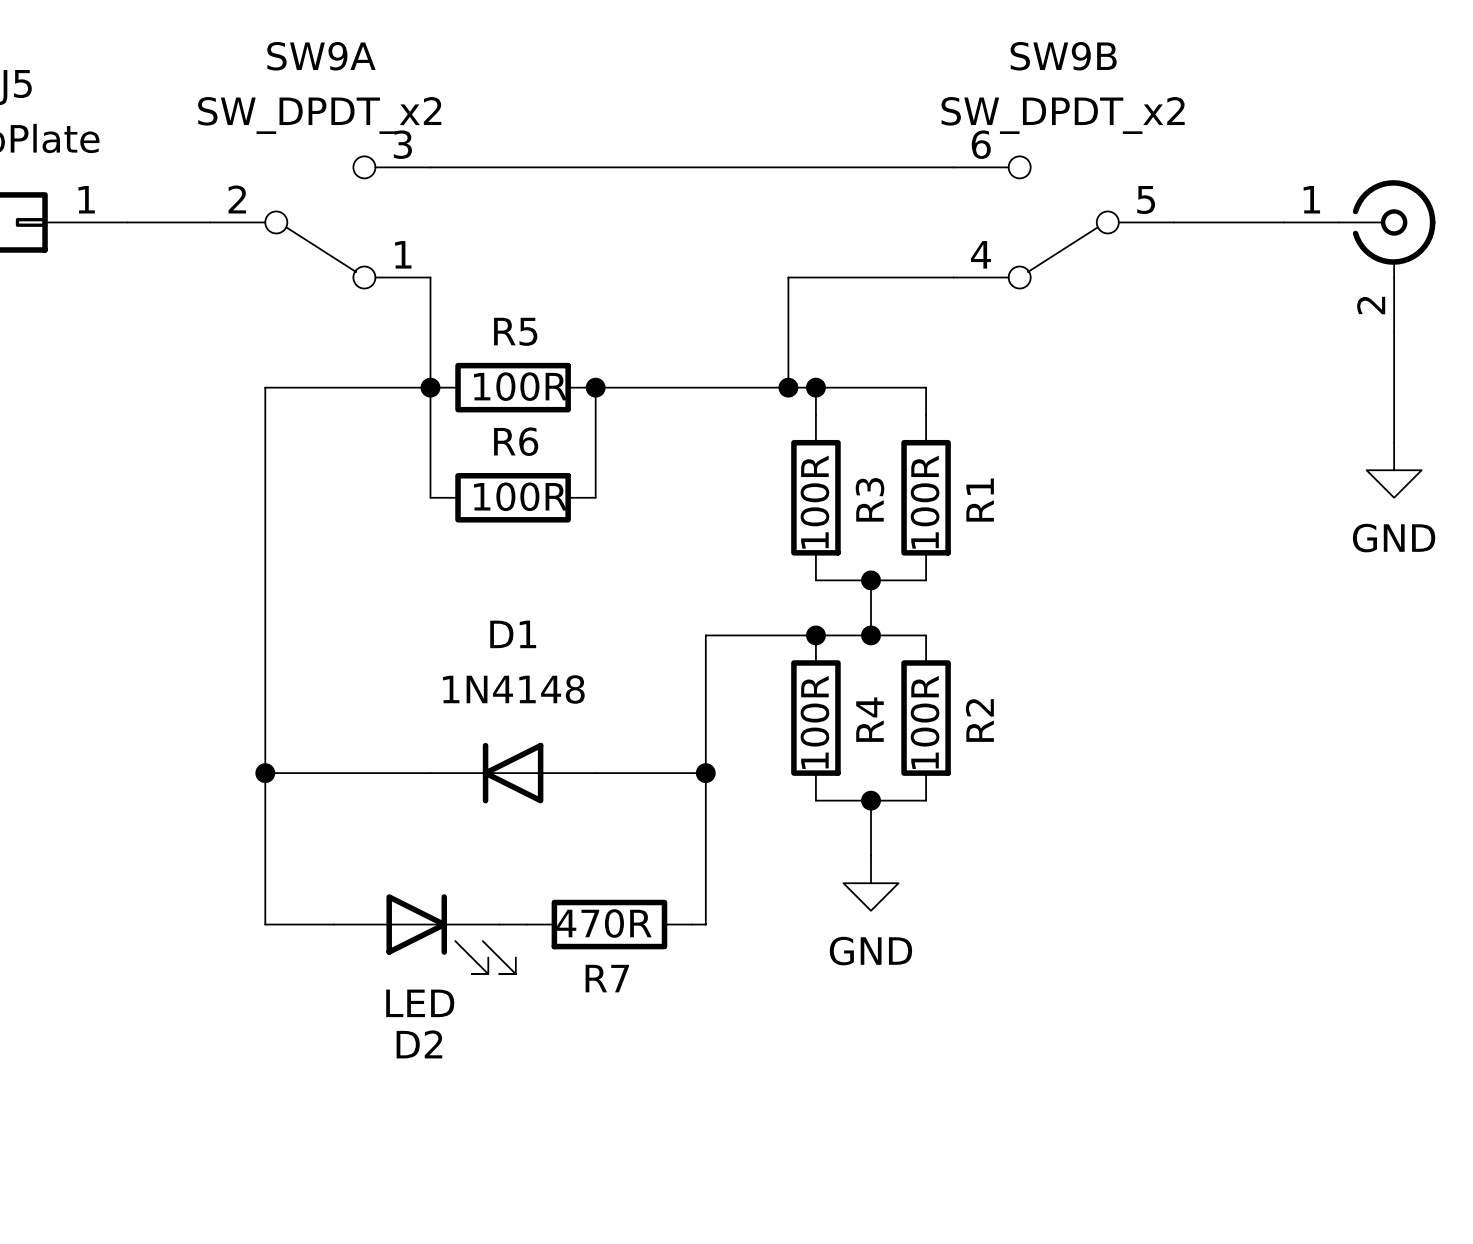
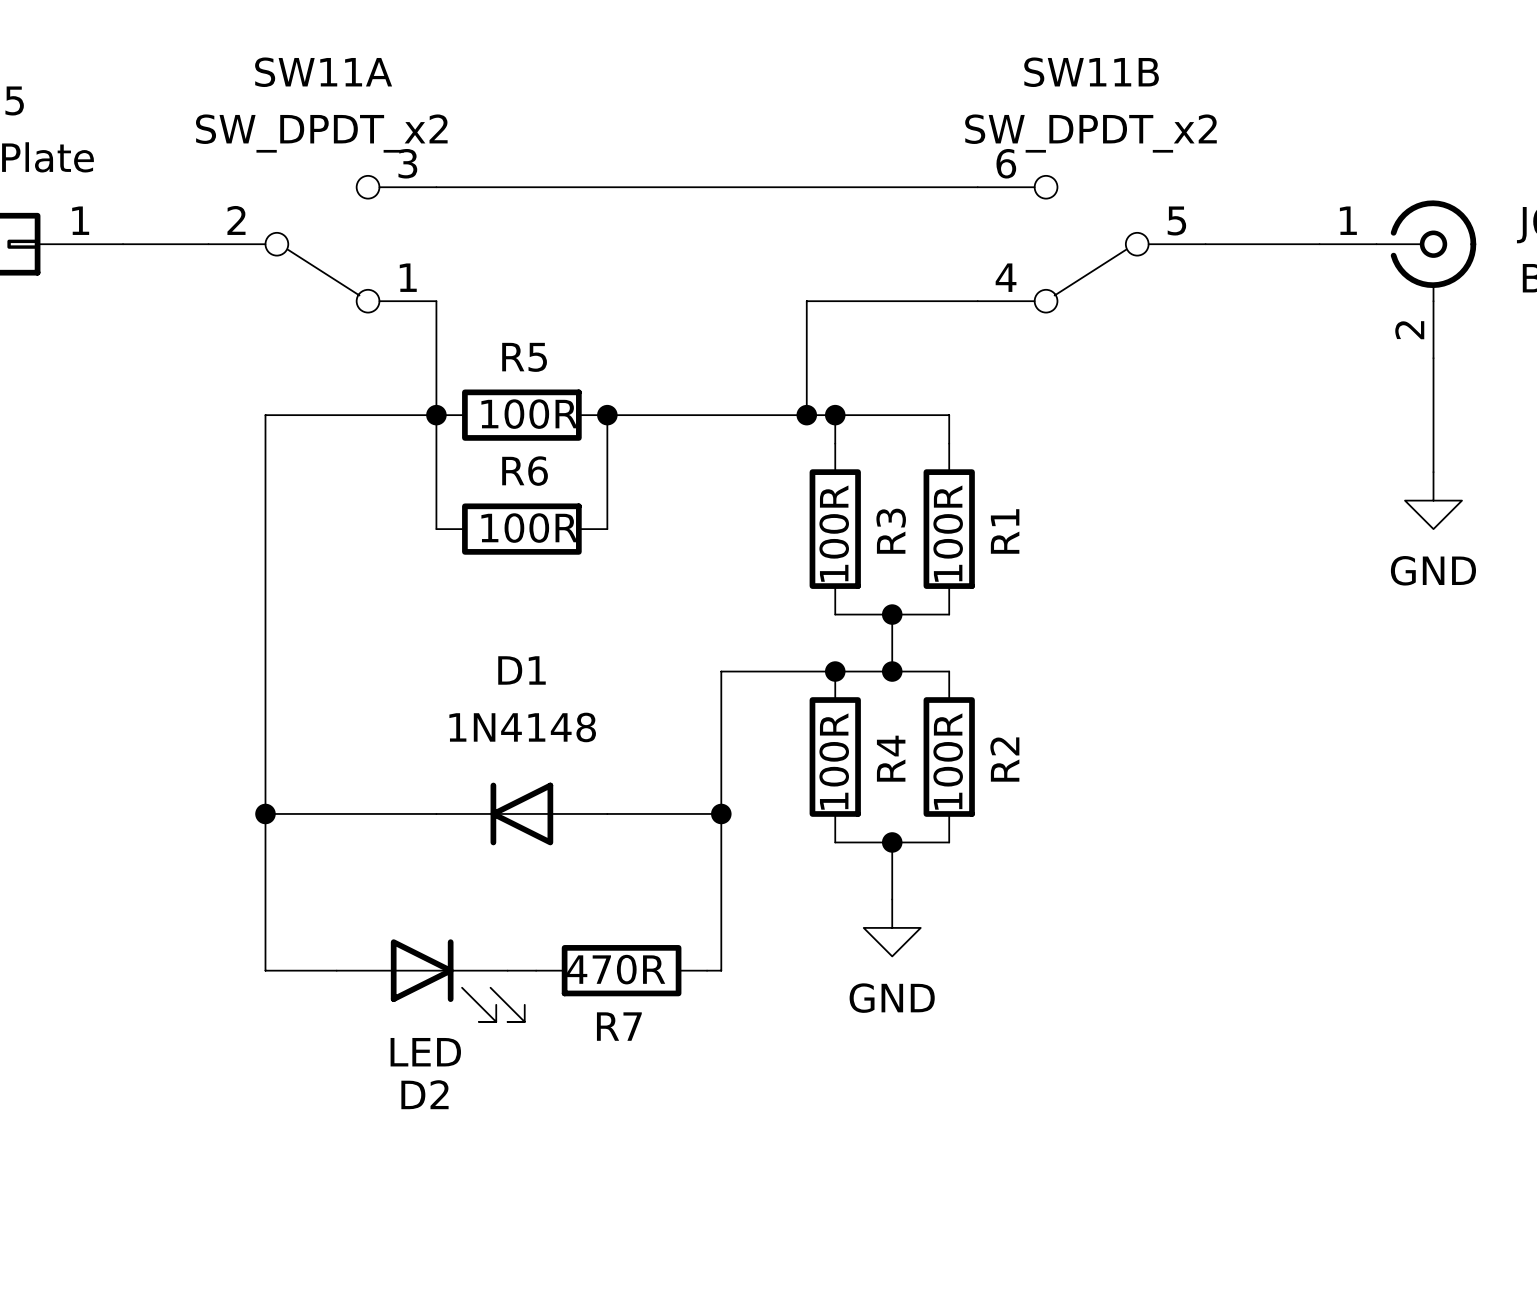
SW9A name: SW9A (321, 56) -> SW11A (323, 72)
SW9B name: SW9B (1063, 56) -> SW11B (1091, 72)

